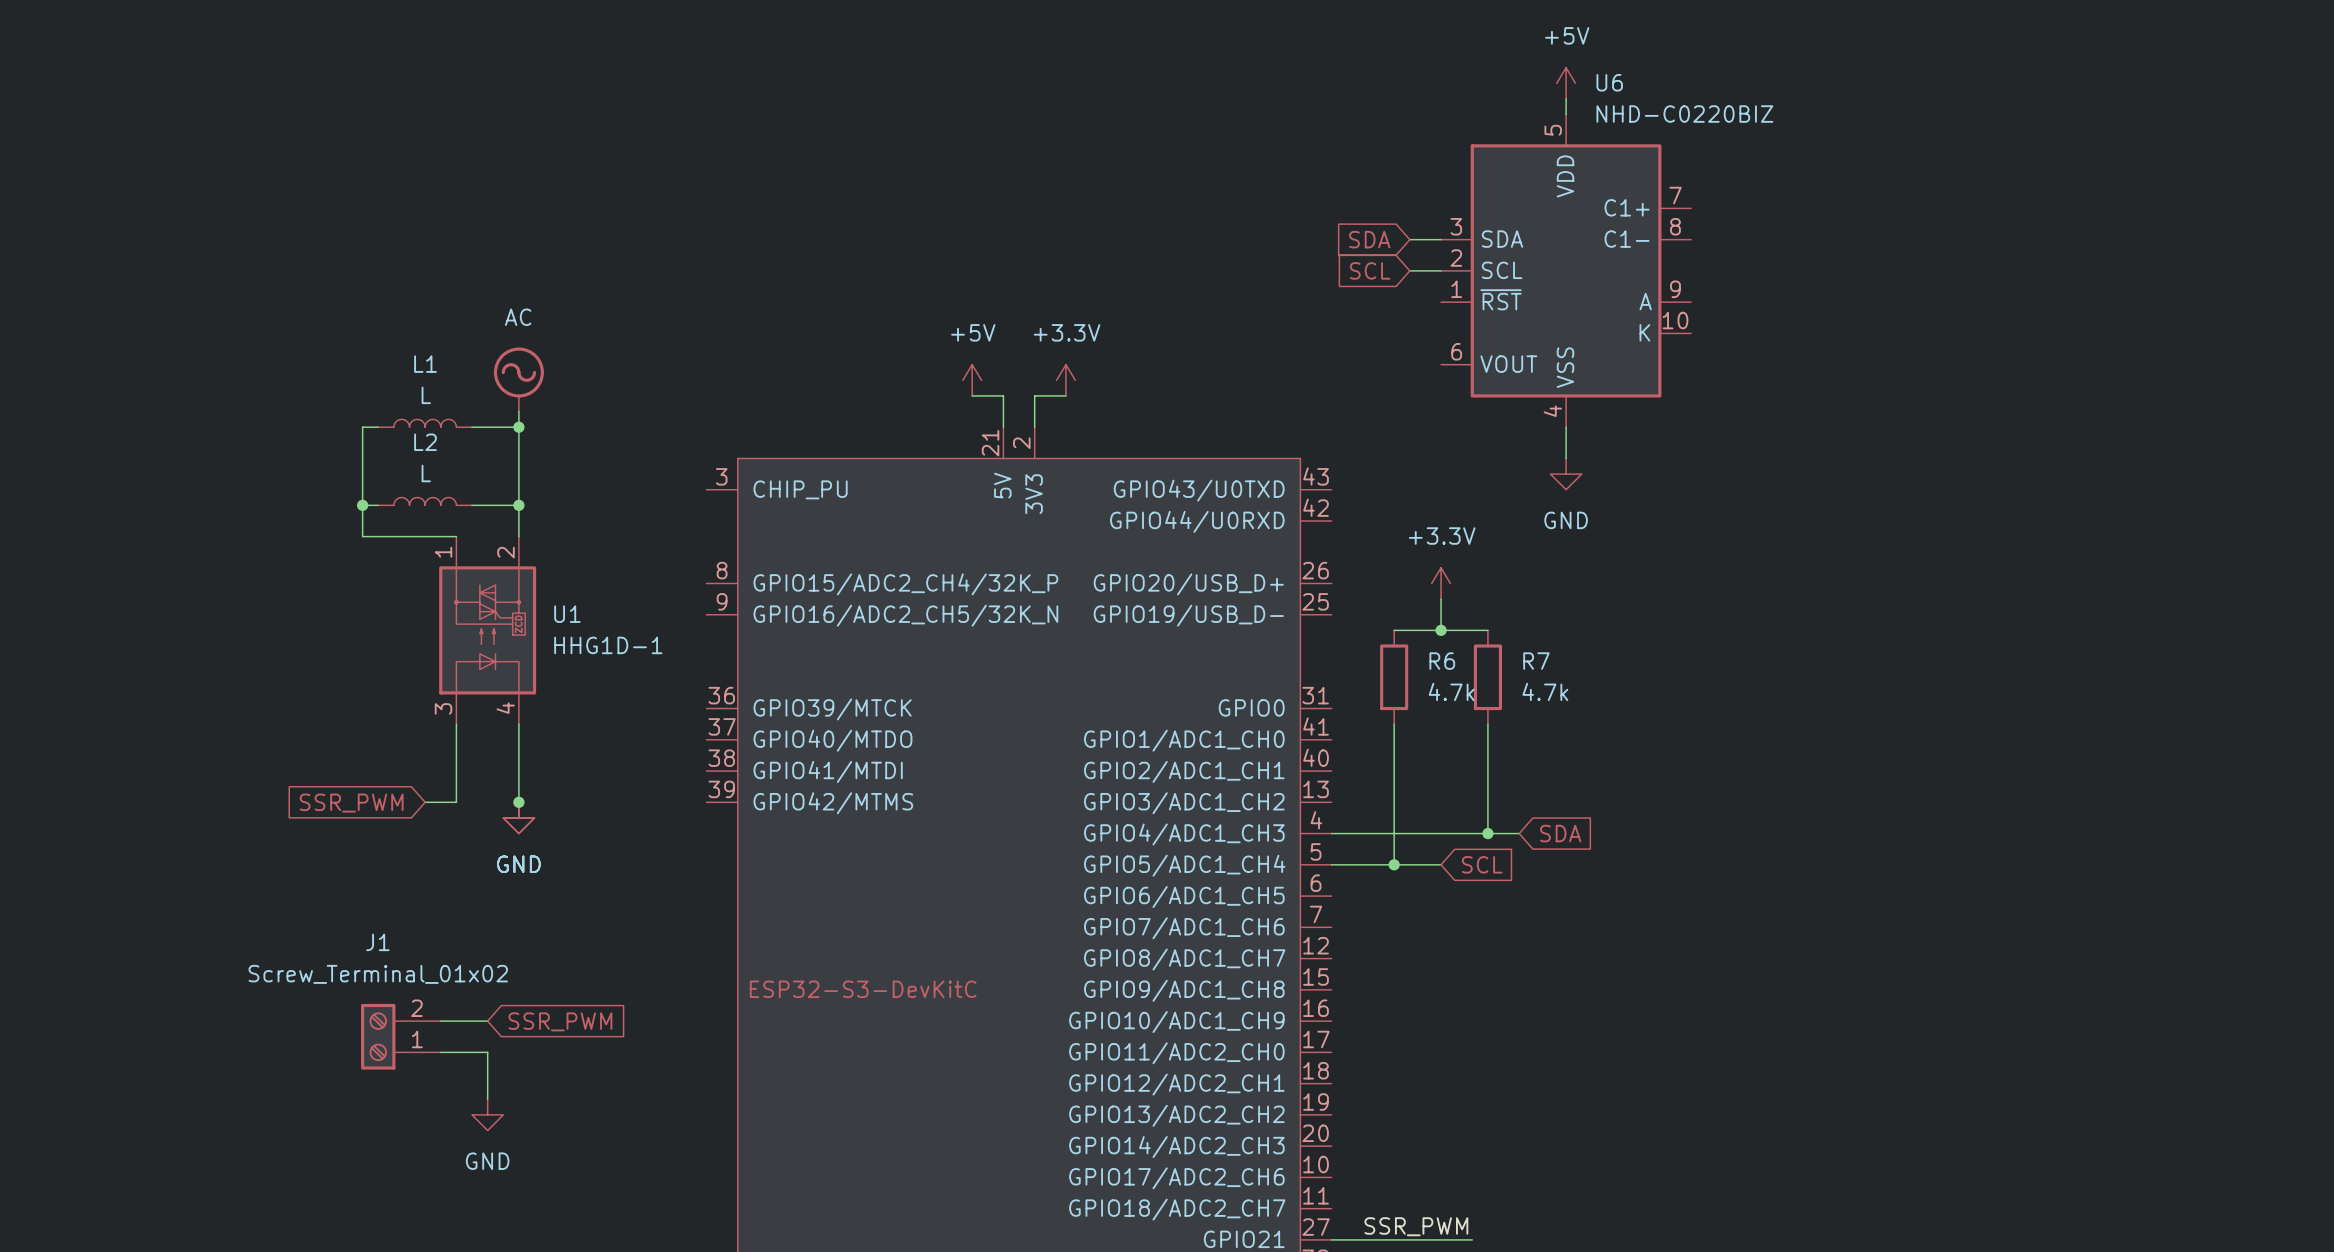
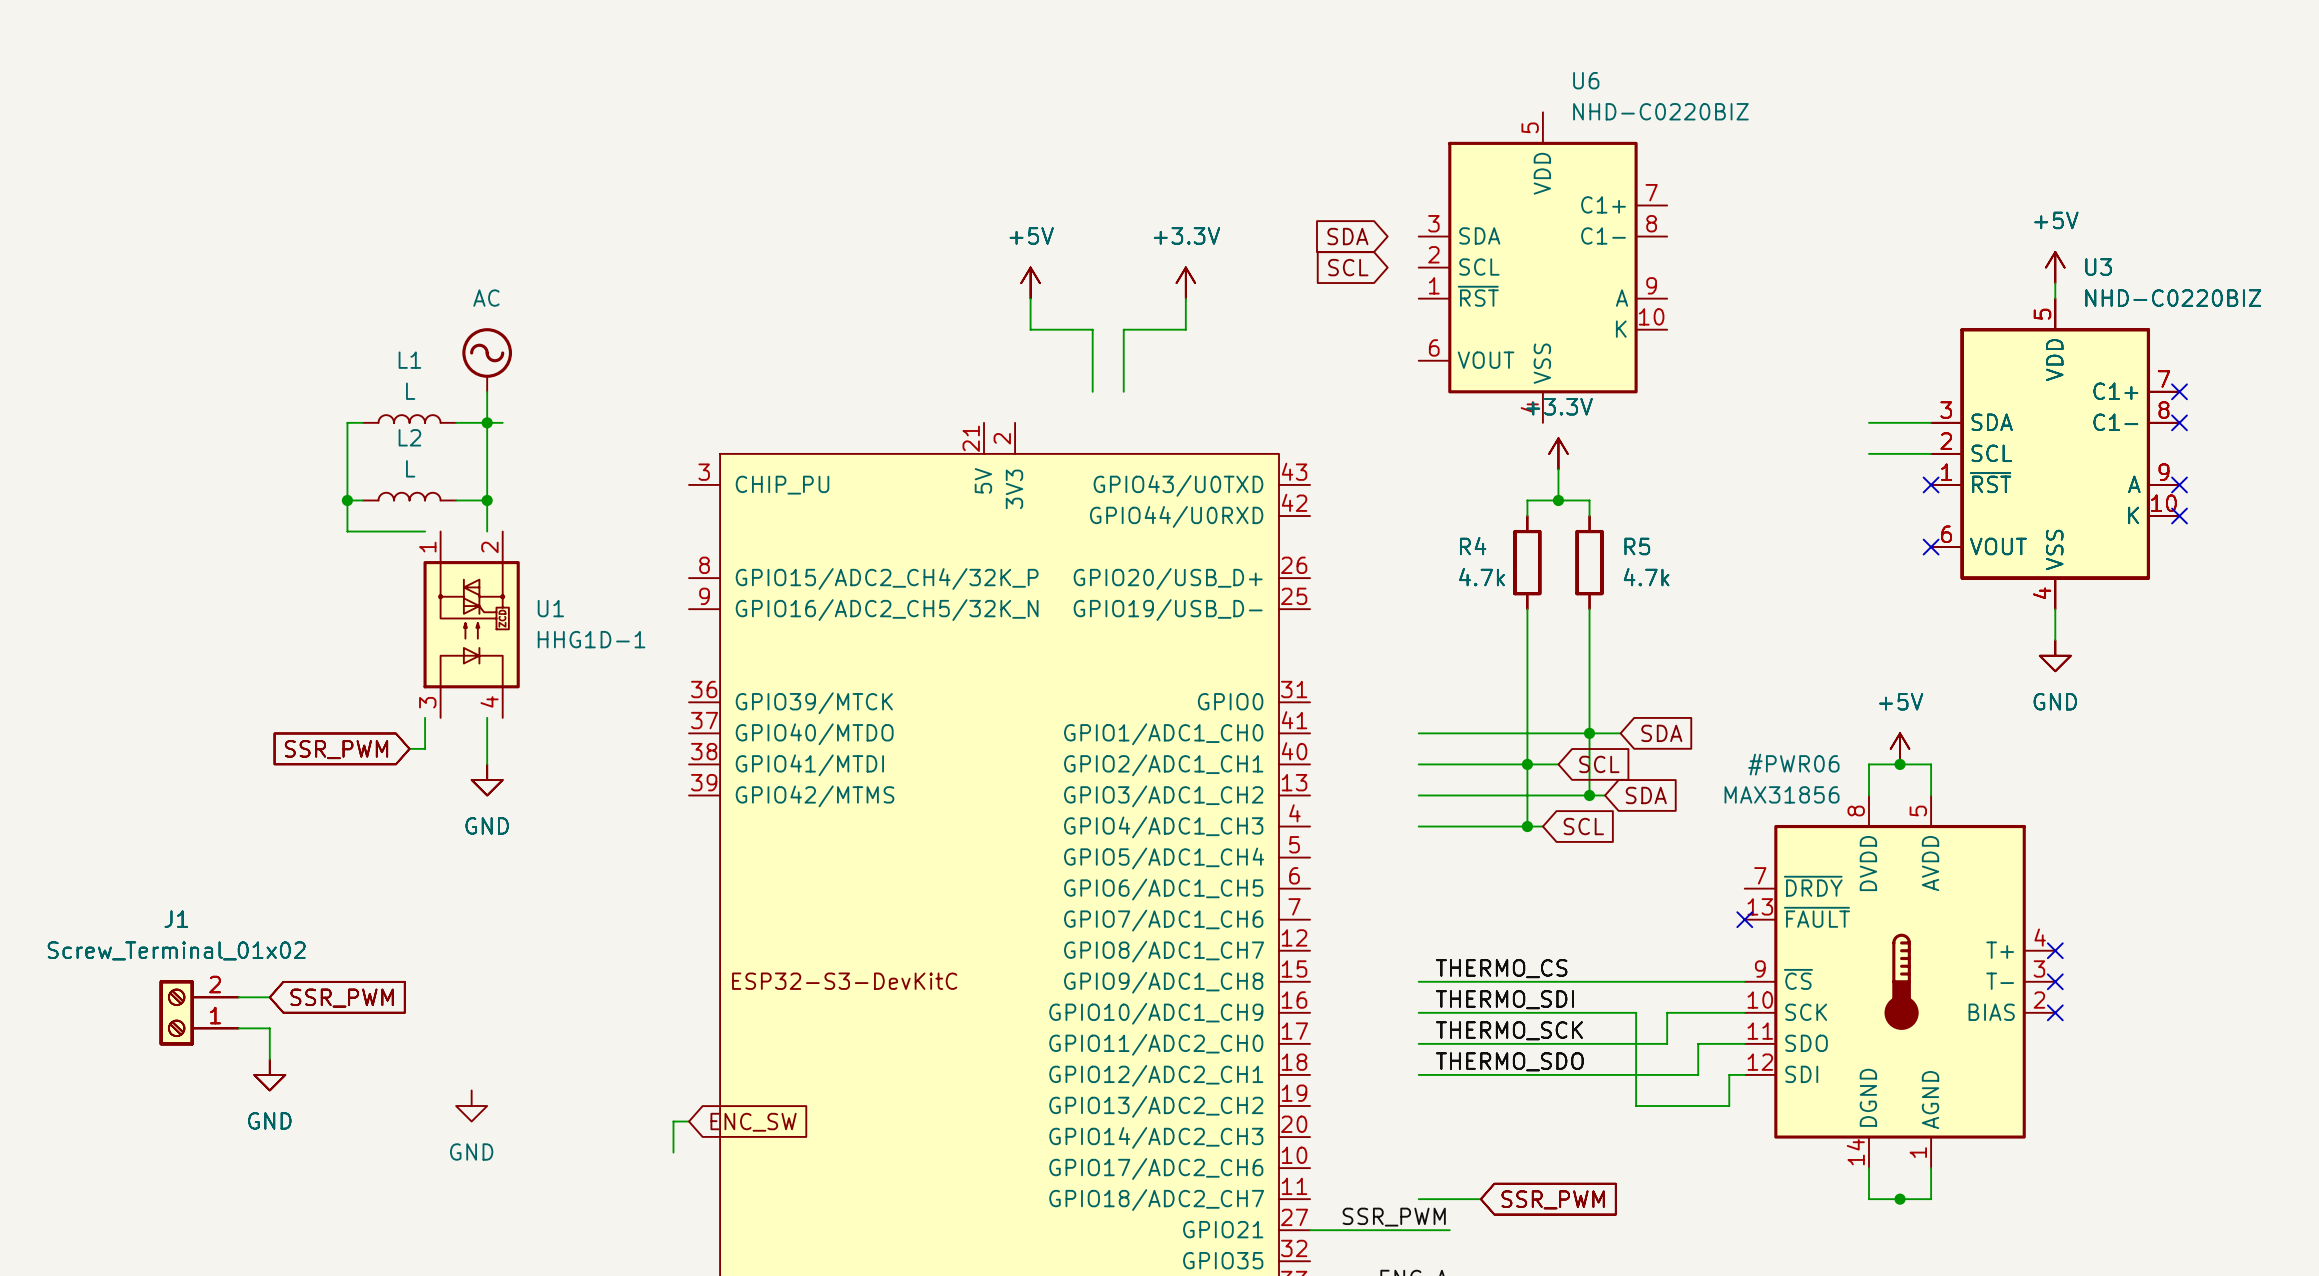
power symbol: +5V (1566, 83) -> none
wire: (1566, 98) (1566, 114) -> none
wire: (1409, 239) (1441, 239) -> none
wire: (1409, 270) (1441, 270) -> none
power symbol: none -> +5V (2055, 267)
wire: none -> (2055, 283) (2055, 298)
wire: none -> (1030, 298) (1030, 329) (1092, 329) (1092, 391)
wire: none -> (1185, 298) (1185, 329) (1123, 329) (1123, 391)
power symbol position: AC (518, 379) -> AC (487, 359)
power symbol position: +5V (972, 380) -> +5V (1030, 283)
power symbol position: +3.3V (1065, 380) -> +3.3V (1185, 283)
wire: none -> (487, 391) (487, 531)
wire: (972, 395) (1003, 395) (1003, 427) -> none
wire: (1065, 395) (1034, 395) (1034, 427) -> none
no-connect mark: none -> (2179, 391)
wire: (518, 411) (518, 536) -> none
junction position: (518, 427) -> (487, 422)
wire: (1566, 427) (1566, 458) -> (1558, 469) (1558, 500)
wire: none -> (1868, 422) (1931, 422)
no-connect mark: none -> (2179, 422)
wire: none -> (1868, 453) (1931, 453)
U3: none -> NHD-C0220BIZ (2055, 453)
power symbol: GND (1566, 474) -> none
no-connect mark: none -> (1931, 484)
no-connect mark: none -> (2179, 484)
wire: (503, 505) (518, 505) -> none
junction position: (518, 505) -> (487, 500)
junction: none -> (1558, 500)
wire: none -> (1527, 516) (1527, 500) (1589, 500) (1589, 516)
no-connect mark: none -> (2179, 516)
wire: (440, 536) (456, 536) -> none
no-connect mark: none -> (1931, 547)
R4: none -> 4.7k (1527, 562)
R5: none -> 4.7k (1589, 562)
power symbol position: +3.3V (1441, 583) -> +3.3V (1558, 453)
wire: (1441, 599) (1441, 630) -> none
wire: none -> (1527, 609) (1527, 826)
wire: none -> (1589, 609) (1589, 795)
wire: none -> (2055, 609) (2055, 640)
wire: (1394, 630) (1487, 630) -> none
junction: (1441, 630) -> none
power symbol: none -> GND (2055, 655)
R6: 4.7k (1394, 677) -> none
R7: 4.7k (1487, 677) -> none
wire: none -> (425, 717) (425, 748) (409, 748)
wire: (456, 724) (456, 802) (425, 802) -> none
wire: none -> (487, 717) (487, 764)
wire: (518, 724) (518, 802) -> none
wire: (1394, 724) (1394, 864) -> none
wire: (1487, 724) (1487, 833) -> none
wire: none -> (1418, 733) (1620, 733)
junction: none -> (1589, 733)
global label: none -> SDA (1661, 733)
power symbol: none -> +5V (1900, 748)
wire: none -> (1418, 764) (1558, 764)
junction: none -> (1527, 764)
global label: none -> SCL (1599, 764)
junction: none -> (1900, 764)
junction: (518, 802) -> none
wire: none -> (1418, 795) (1605, 795)
junction: none -> (1589, 795)
global label: none -> SDA (1646, 795)
drawing: none -> [1744, 795, 2056, 1169]
wire: none -> (1868, 795) (1868, 764) (1931, 764) (1931, 795)
global label position: SSR_PWM (351, 803) -> SSR_PWM (336, 749)
power symbol position: GND (518, 817) -> GND (487, 779)
wire: (1331, 833) (1441, 833) -> none
junction: (1487, 833) -> none
wire: none -> (1496, 826) (1542, 826)
junction: none -> (1527, 826)
global label: SDA (1560, 833) -> none
global label: none -> SCL (1583, 826)
wire: (1331, 864) (1441, 864) -> none
junction: (1394, 864) -> none
global label: SCL (1482, 864) -> none
no-connect mark: none -> (1744, 919)
no-connect mark: none -> (2055, 950)
label: none -> THERMO_CS (1501, 968)
wire: none -> (1418, 981) (1744, 981)
no-connect mark: none -> (2055, 981)
wire: none -> (238, 997) (269, 997)
global label: none -> SSR_PWM (342, 998)
label: none -> THERMO_SDI (1504, 999)
wire: (440, 1021) (487, 1021) -> none
global label: SSR_PWM (560, 1021) -> none
wire: none -> (1418, 1012) (1636, 1012) (1636, 1106) (1729, 1106) (1729, 1074) (1744, 1074)
wire: none -> (1744, 1012) (1667, 1012) (1667, 1043) (1418, 1043)
no-connect mark: none -> (2055, 1012)
wire: none -> (238, 1028) (269, 1028) (269, 1059)
J1 position: (400, 1036) -> (199, 1012)
label: none -> THERMO_SCK (1509, 1030)
wire: (440, 1052) (487, 1052) (487, 1099) -> none
wire: none -> (1744, 1043) (1698, 1043) (1698, 1074) (1418, 1074)
label: none -> THERMO_SDO (1509, 1061)
power symbol: none -> GND (269, 1074)
wire: none -> (689, 1121) (673, 1121) (673, 1152)
global label: none -> ENC_SW (753, 1122)
wire: none -> (1868, 1168) (1868, 1199) (1931, 1199) (1931, 1168)
wire: none -> (1418, 1199) (1480, 1199)
junction: none -> (1900, 1199)
global label: none -> SSR_PWM (1553, 1199)

